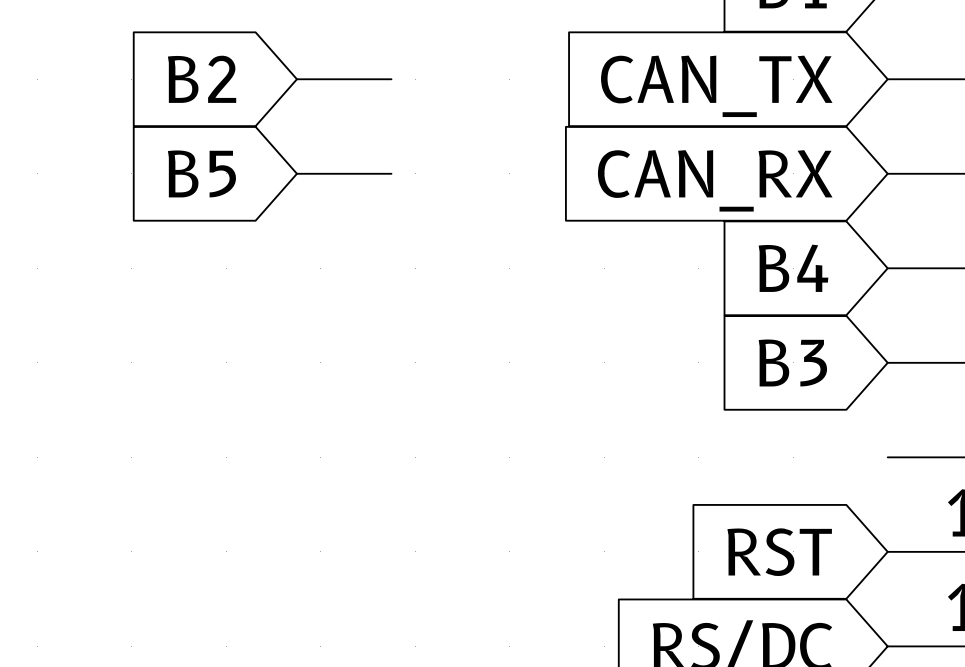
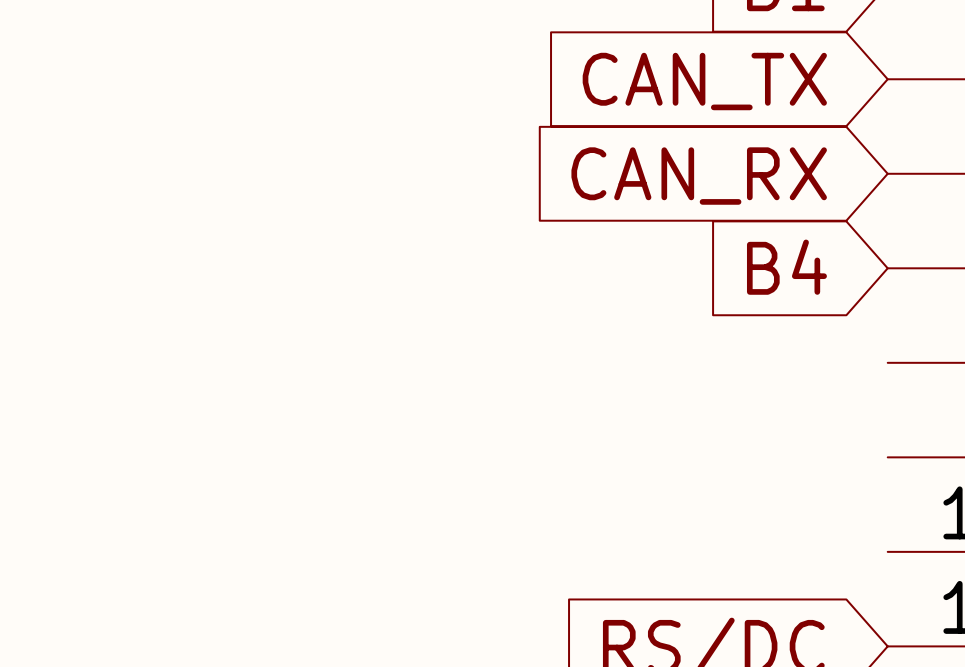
global label: B2 (202, 79) -> none
wire: (296, 79) (391, 79) -> none
global label: B5 (201, 173) -> none
wire: (296, 173) (391, 173) -> none
global label: B3 (792, 362) -> none
global label: RST (779, 552) -> none

